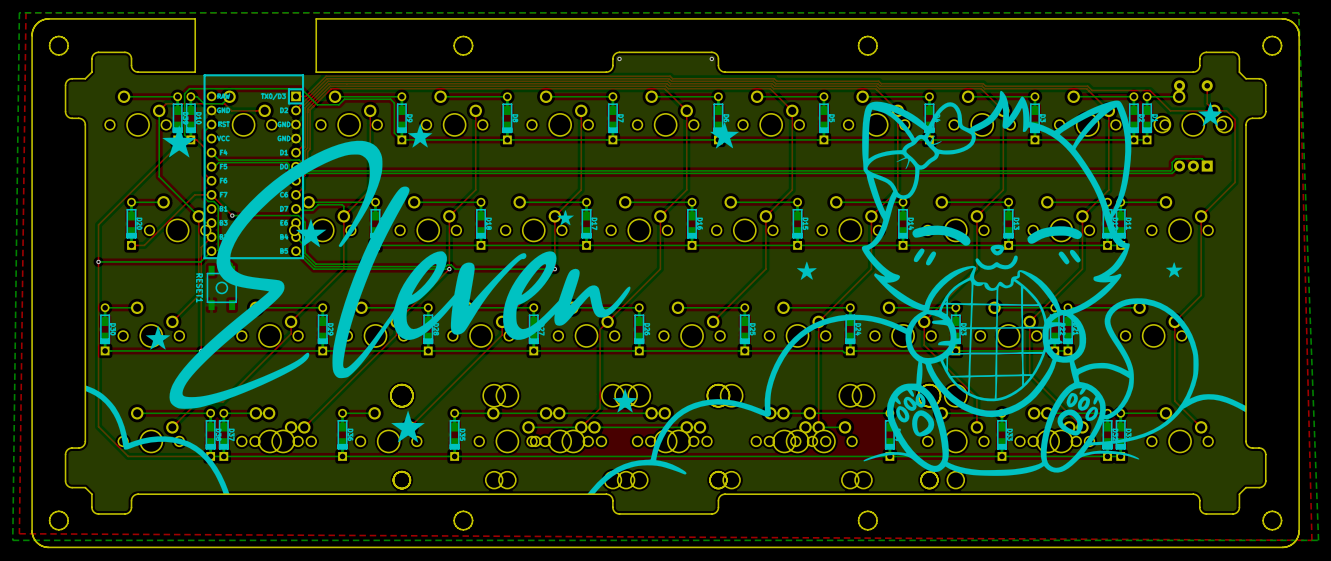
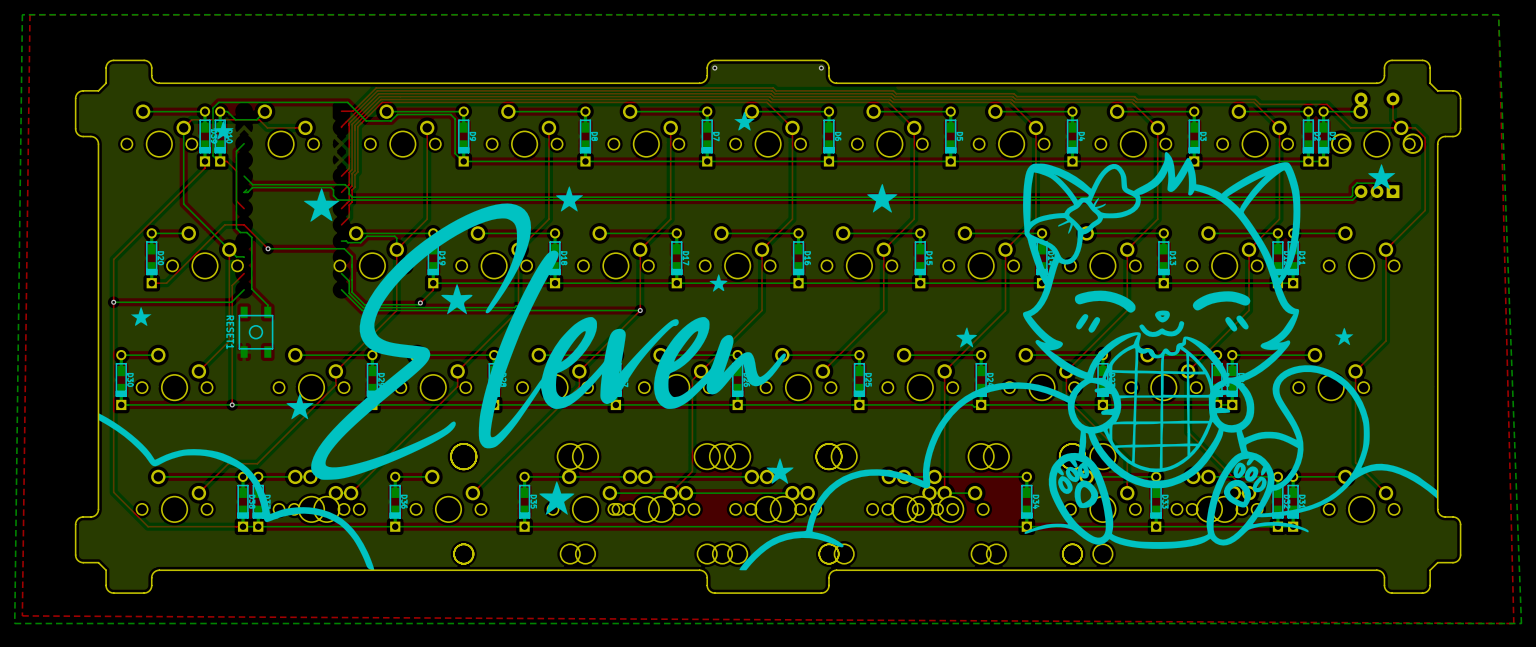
board edge: (58, 36) (64, 38) (68, 45) (64, 53) (58, 55) (53, 53) (49, 45) (53, 38) (58, 36) -> none
board edge: (463, 36) (470, 40) (472, 45) (470, 51) (463, 55) (455, 51) (454, 45) (455, 40) (463, 36) -> none
board edge: (867, 36) (875, 40) (877, 45) (873, 53) (867, 55) (862, 53) (858, 45) (860, 40) (867, 36) -> none
board edge: (1272, 36) (1277, 38) (1281, 45) (1277, 53) (1272, 55) (1266, 53) (1263, 45) (1264, 40) (1272, 36) -> none
board edge: (316, 72) (316, 18) (1282, 18) (1290, 20) (1296, 26) (1299, 35) (1299, 530) (1297, 538) (1291, 544) (1282, 547) (42, 546) (34, 539) (32, 530) (32, 30) (37, 22) (47, 18) (195, 18) (195, 72) -> (364, 83) (225, 83)
drawing shape: [85, 90, 1247, 495] -> [98, 111, 1439, 571]
part: (253, 166) -> none
board edge: (58, 511) (64, 513) (68, 520) (64, 528) (58, 529) (53, 528) (49, 520) (53, 513) (58, 511) -> none
board edge: (463, 511) (470, 515) (472, 520) (470, 526) (463, 529) (455, 526) (454, 520) (455, 515) (463, 511) -> none
board edge: (867, 511) (860, 515) (858, 520) (860, 526) (867, 529) (875, 526) (877, 520) (873, 513) (867, 511) -> none
board edge: (1272, 511) (1264, 515) (1263, 520) (1264, 526) (1272, 529) (1277, 528) (1281, 520) (1277, 513) (1272, 511) -> none

